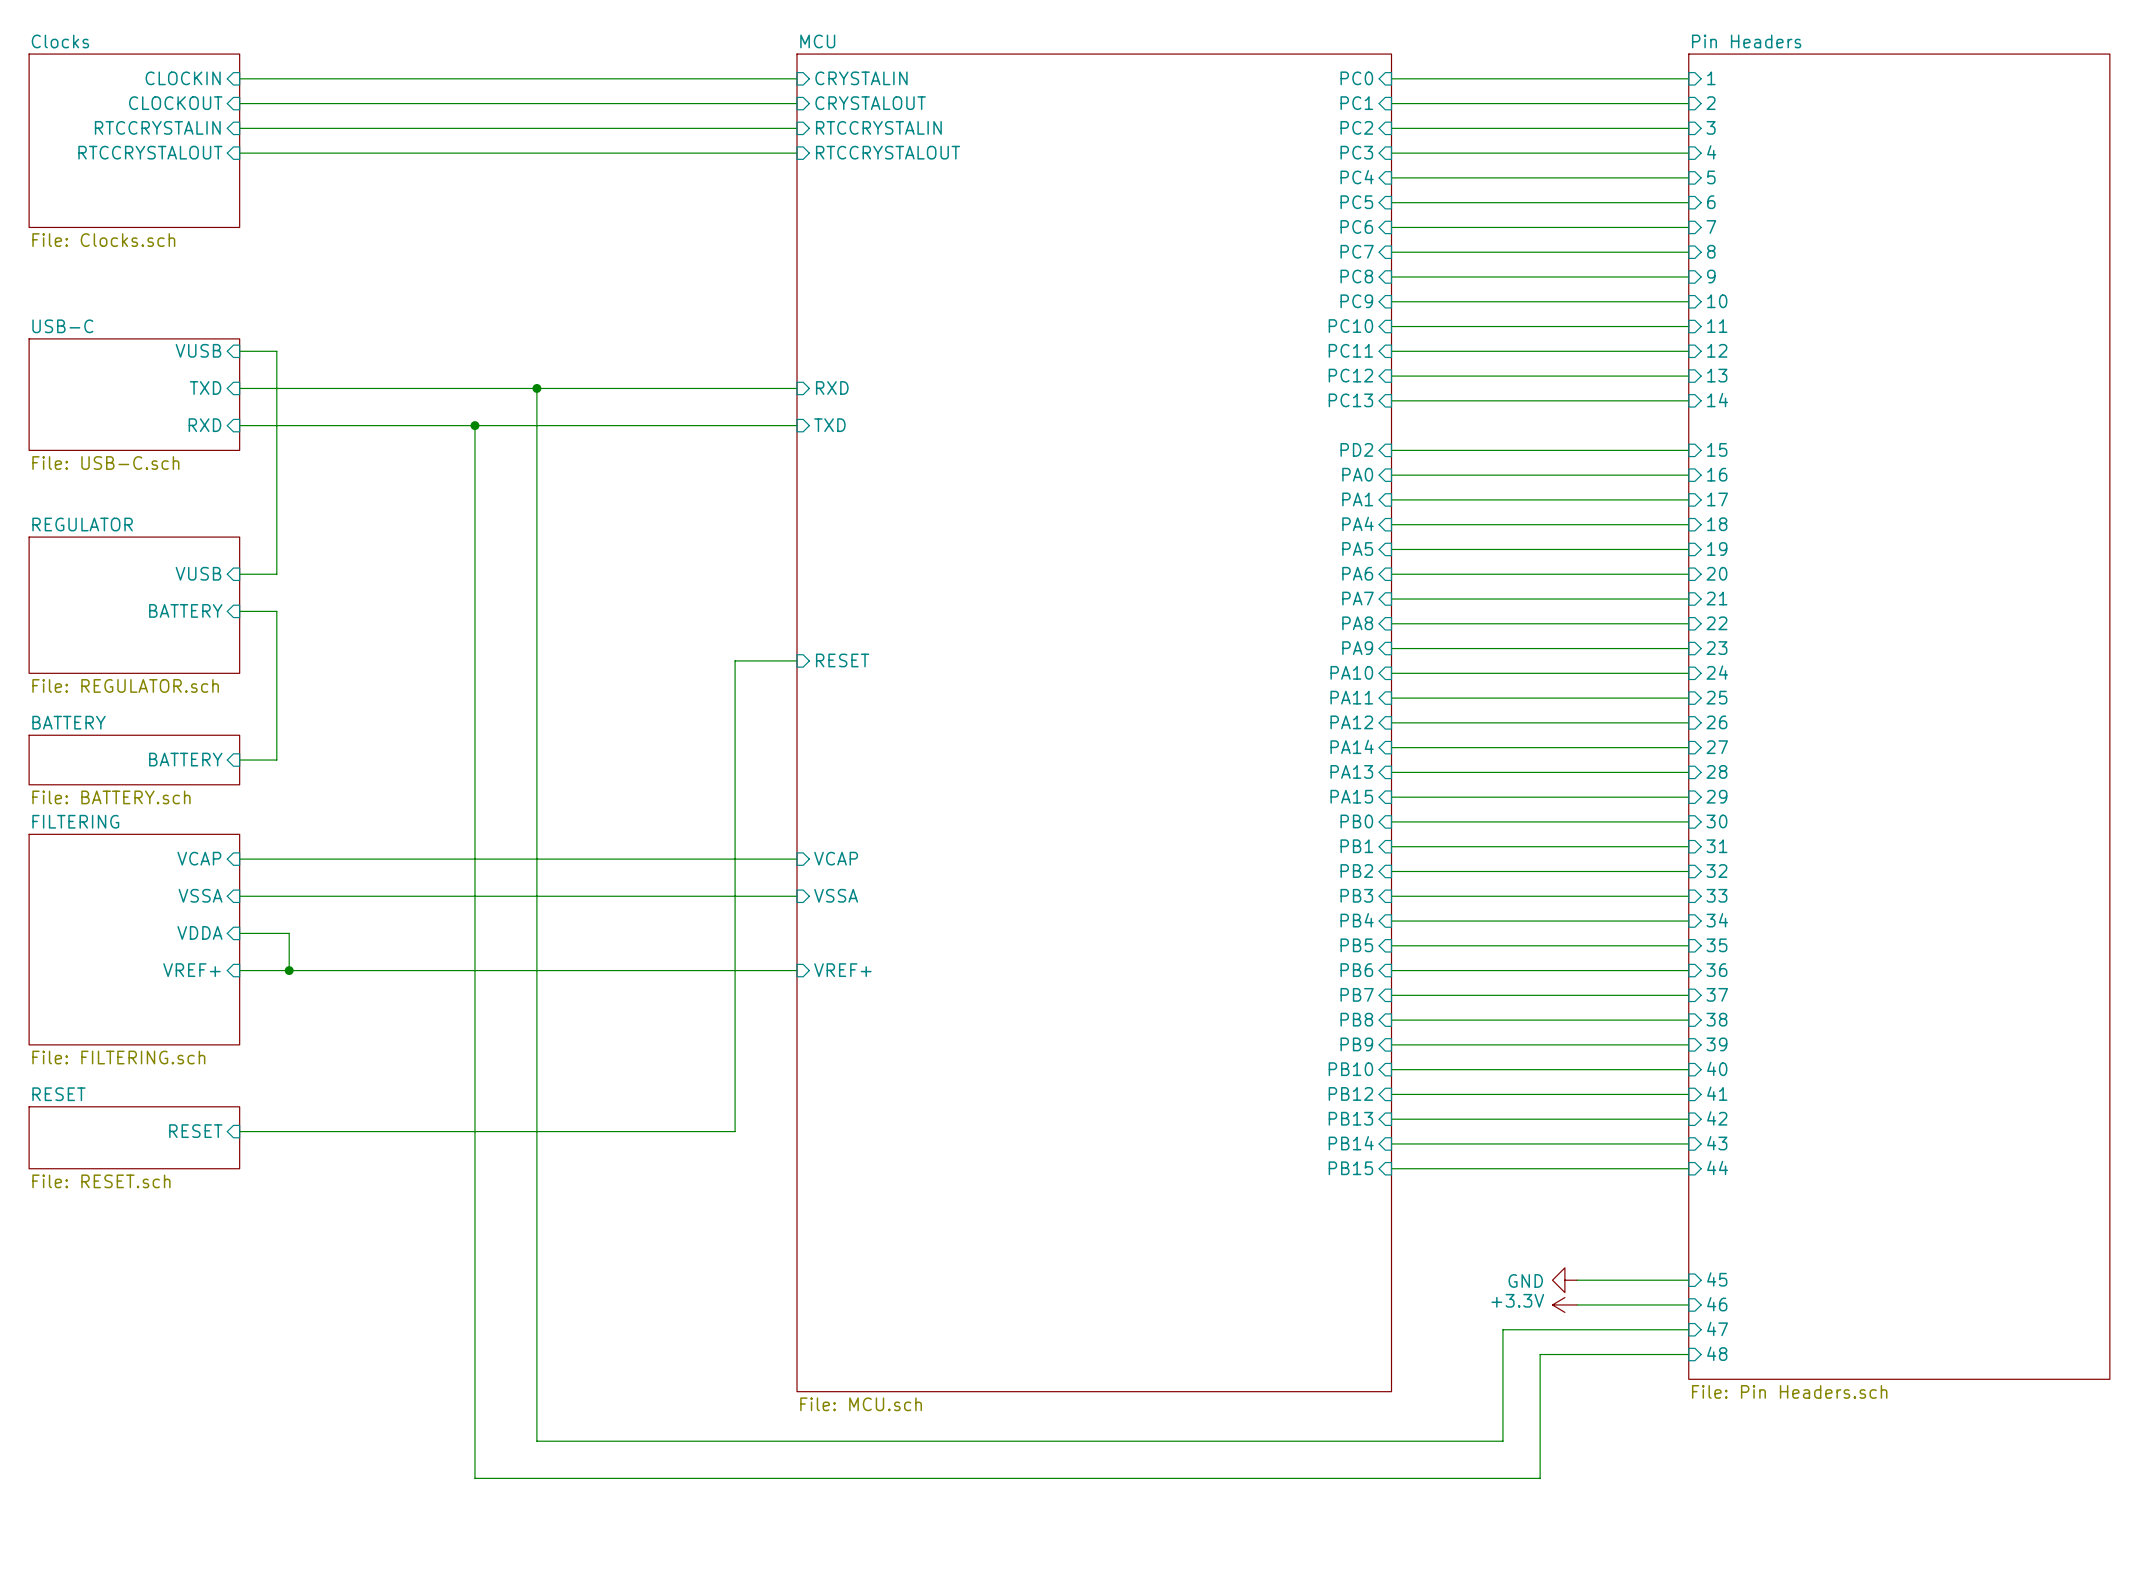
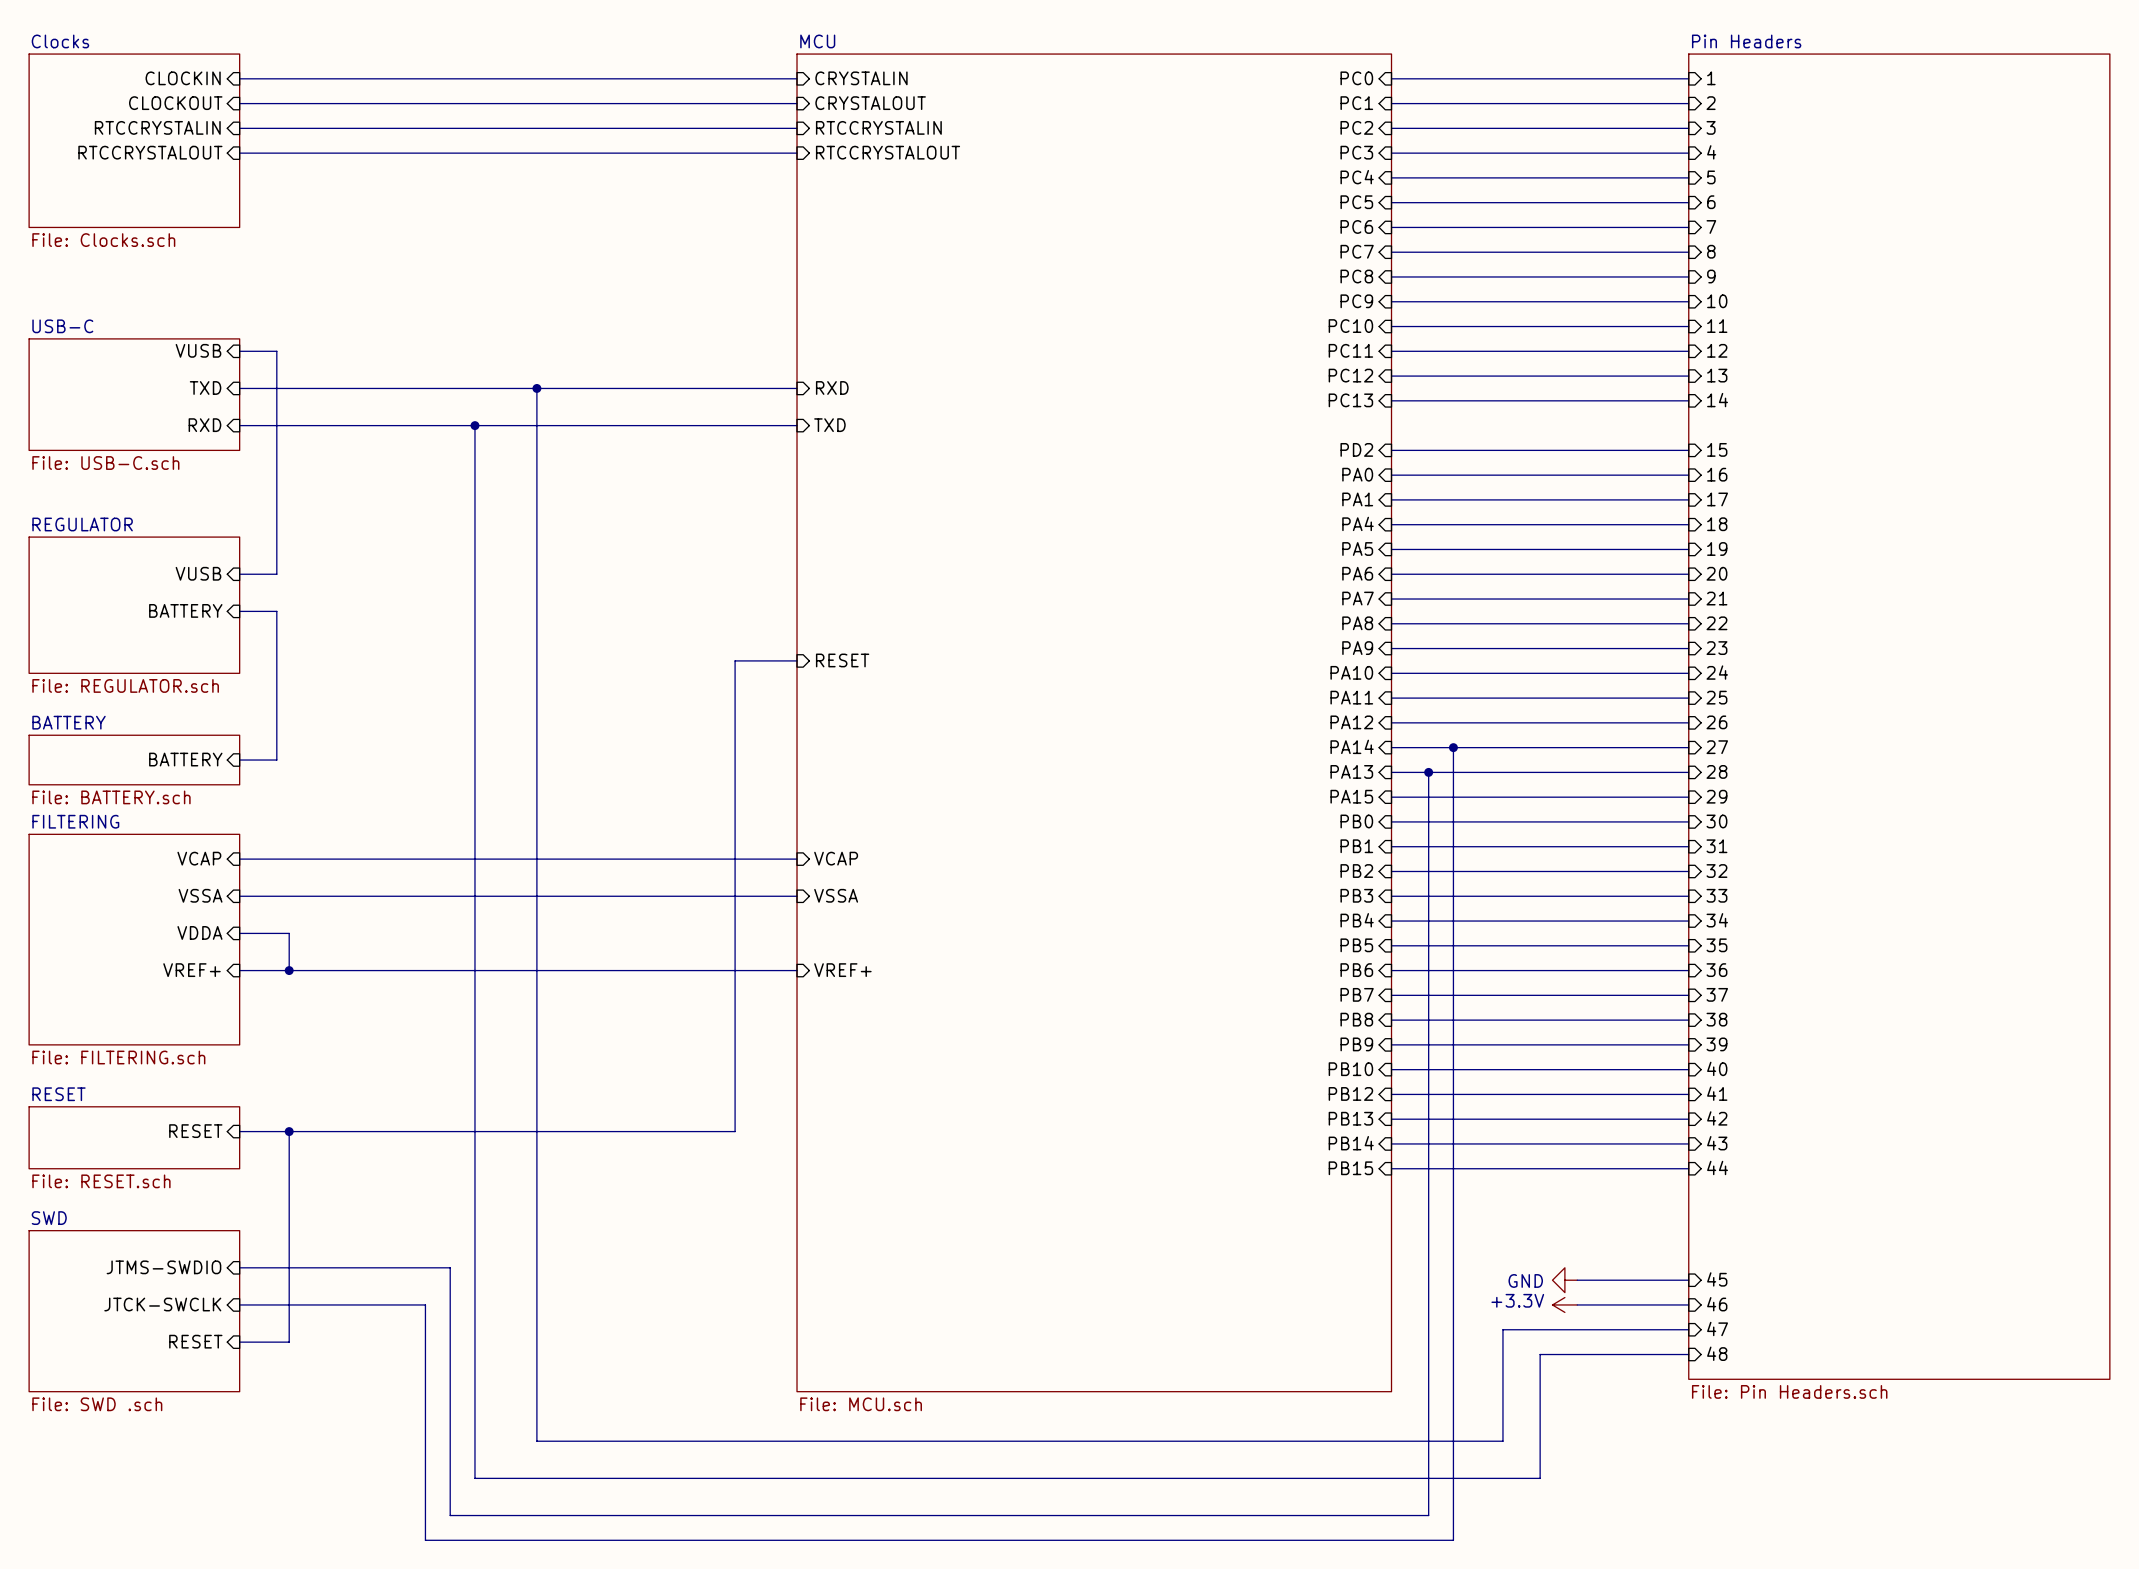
wire: none -> (1453, 747) (1453, 1540) (425, 1540) (425, 1304) (239, 1304)
junction: none -> (1453, 747)
wire: none -> (1428, 772) (1428, 1515) (450, 1515) (450, 1267) (239, 1267)
junction: none -> (1428, 772)
wire: none -> (289, 1131) (289, 1342) (239, 1342)
junction: none -> (289, 1131)
sheet pin: none -> JTMS-SWDIO (163, 1267)
sheet pin: none -> JTCK-SWCLK (162, 1304)
sheet SWD: none -> File: SWD .sch (134, 1311)
sheet pin: none -> RESET (195, 1341)

